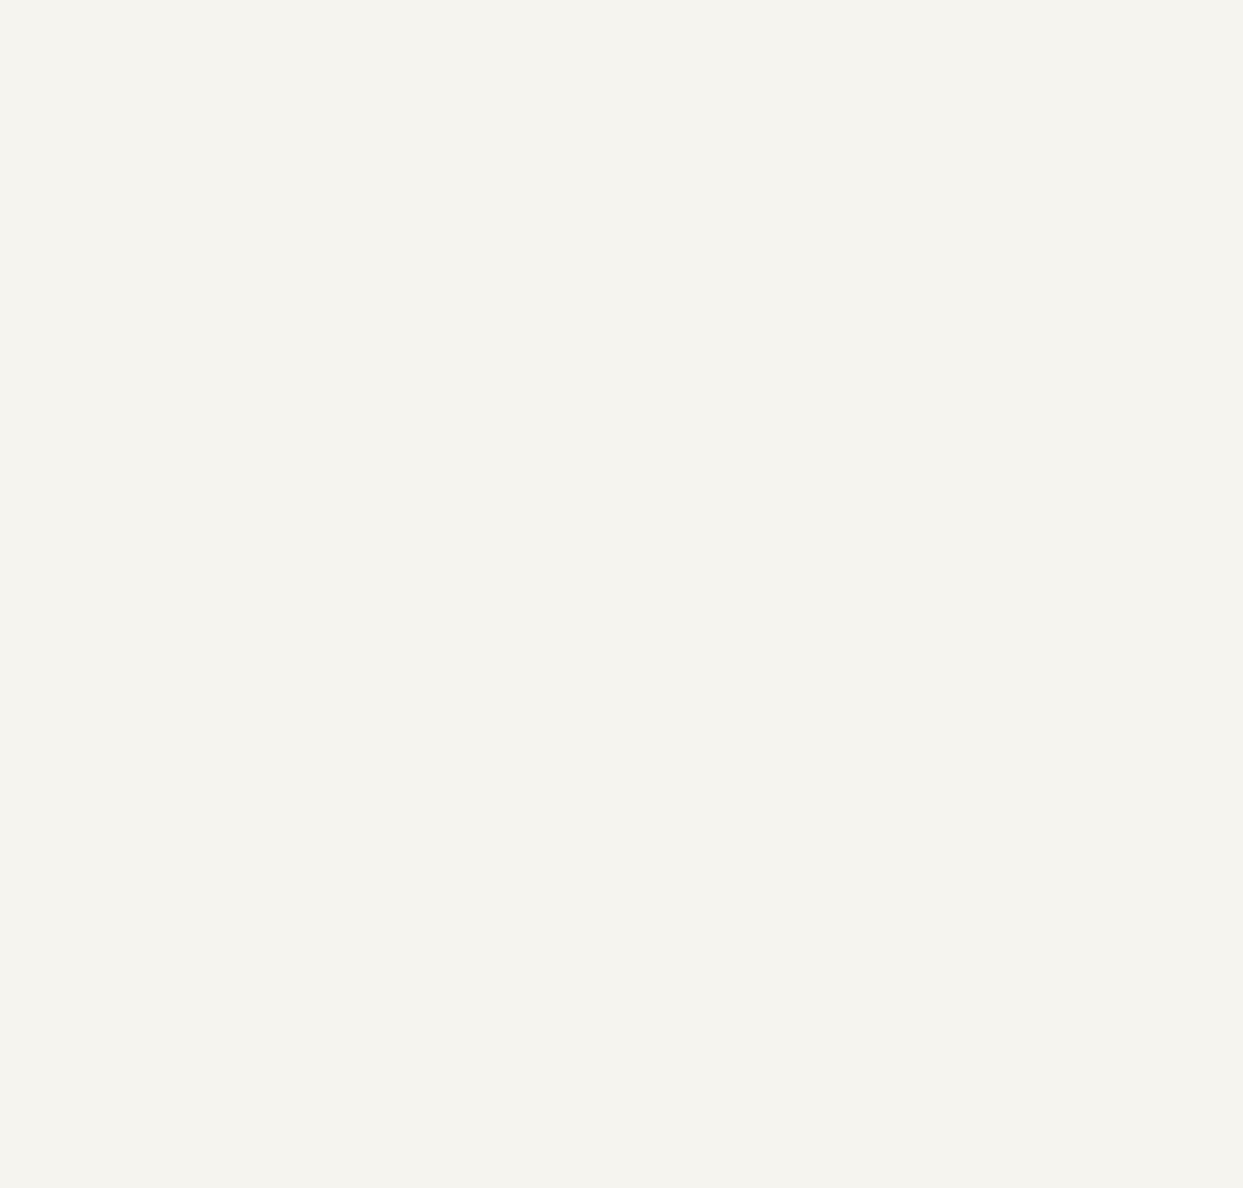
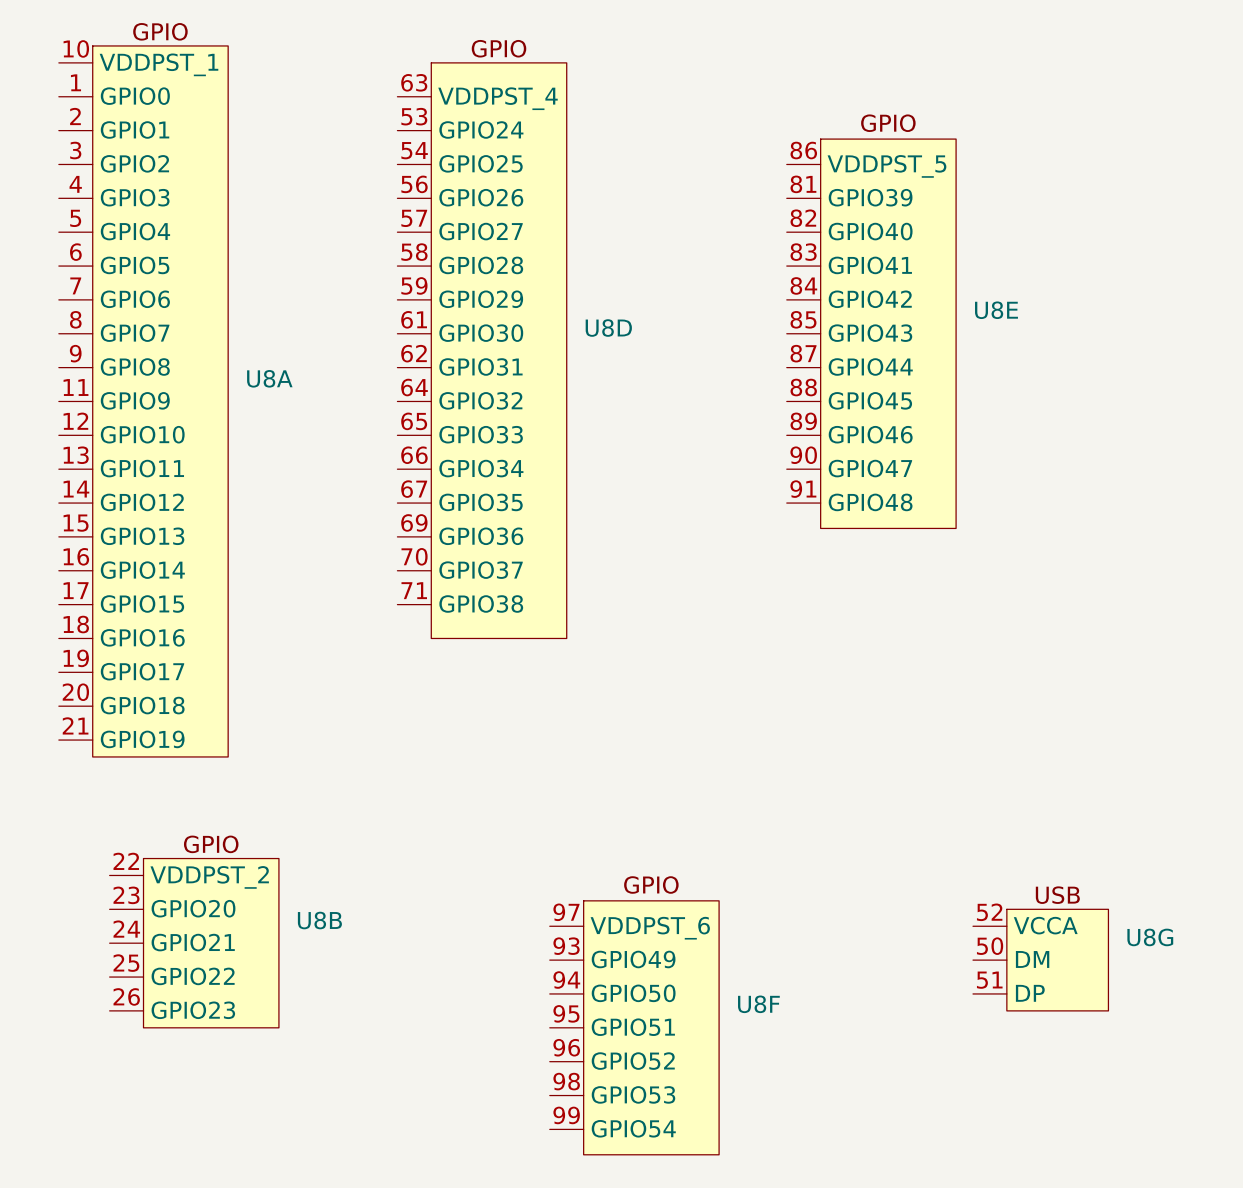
U8E: none -> (871, 333)
U8D: none -> (482, 350)
U8A: none -> (143, 401)
U8B: none -> (194, 943)
U8G: none -> (1040, 960)
U8F: none -> (634, 1027)

